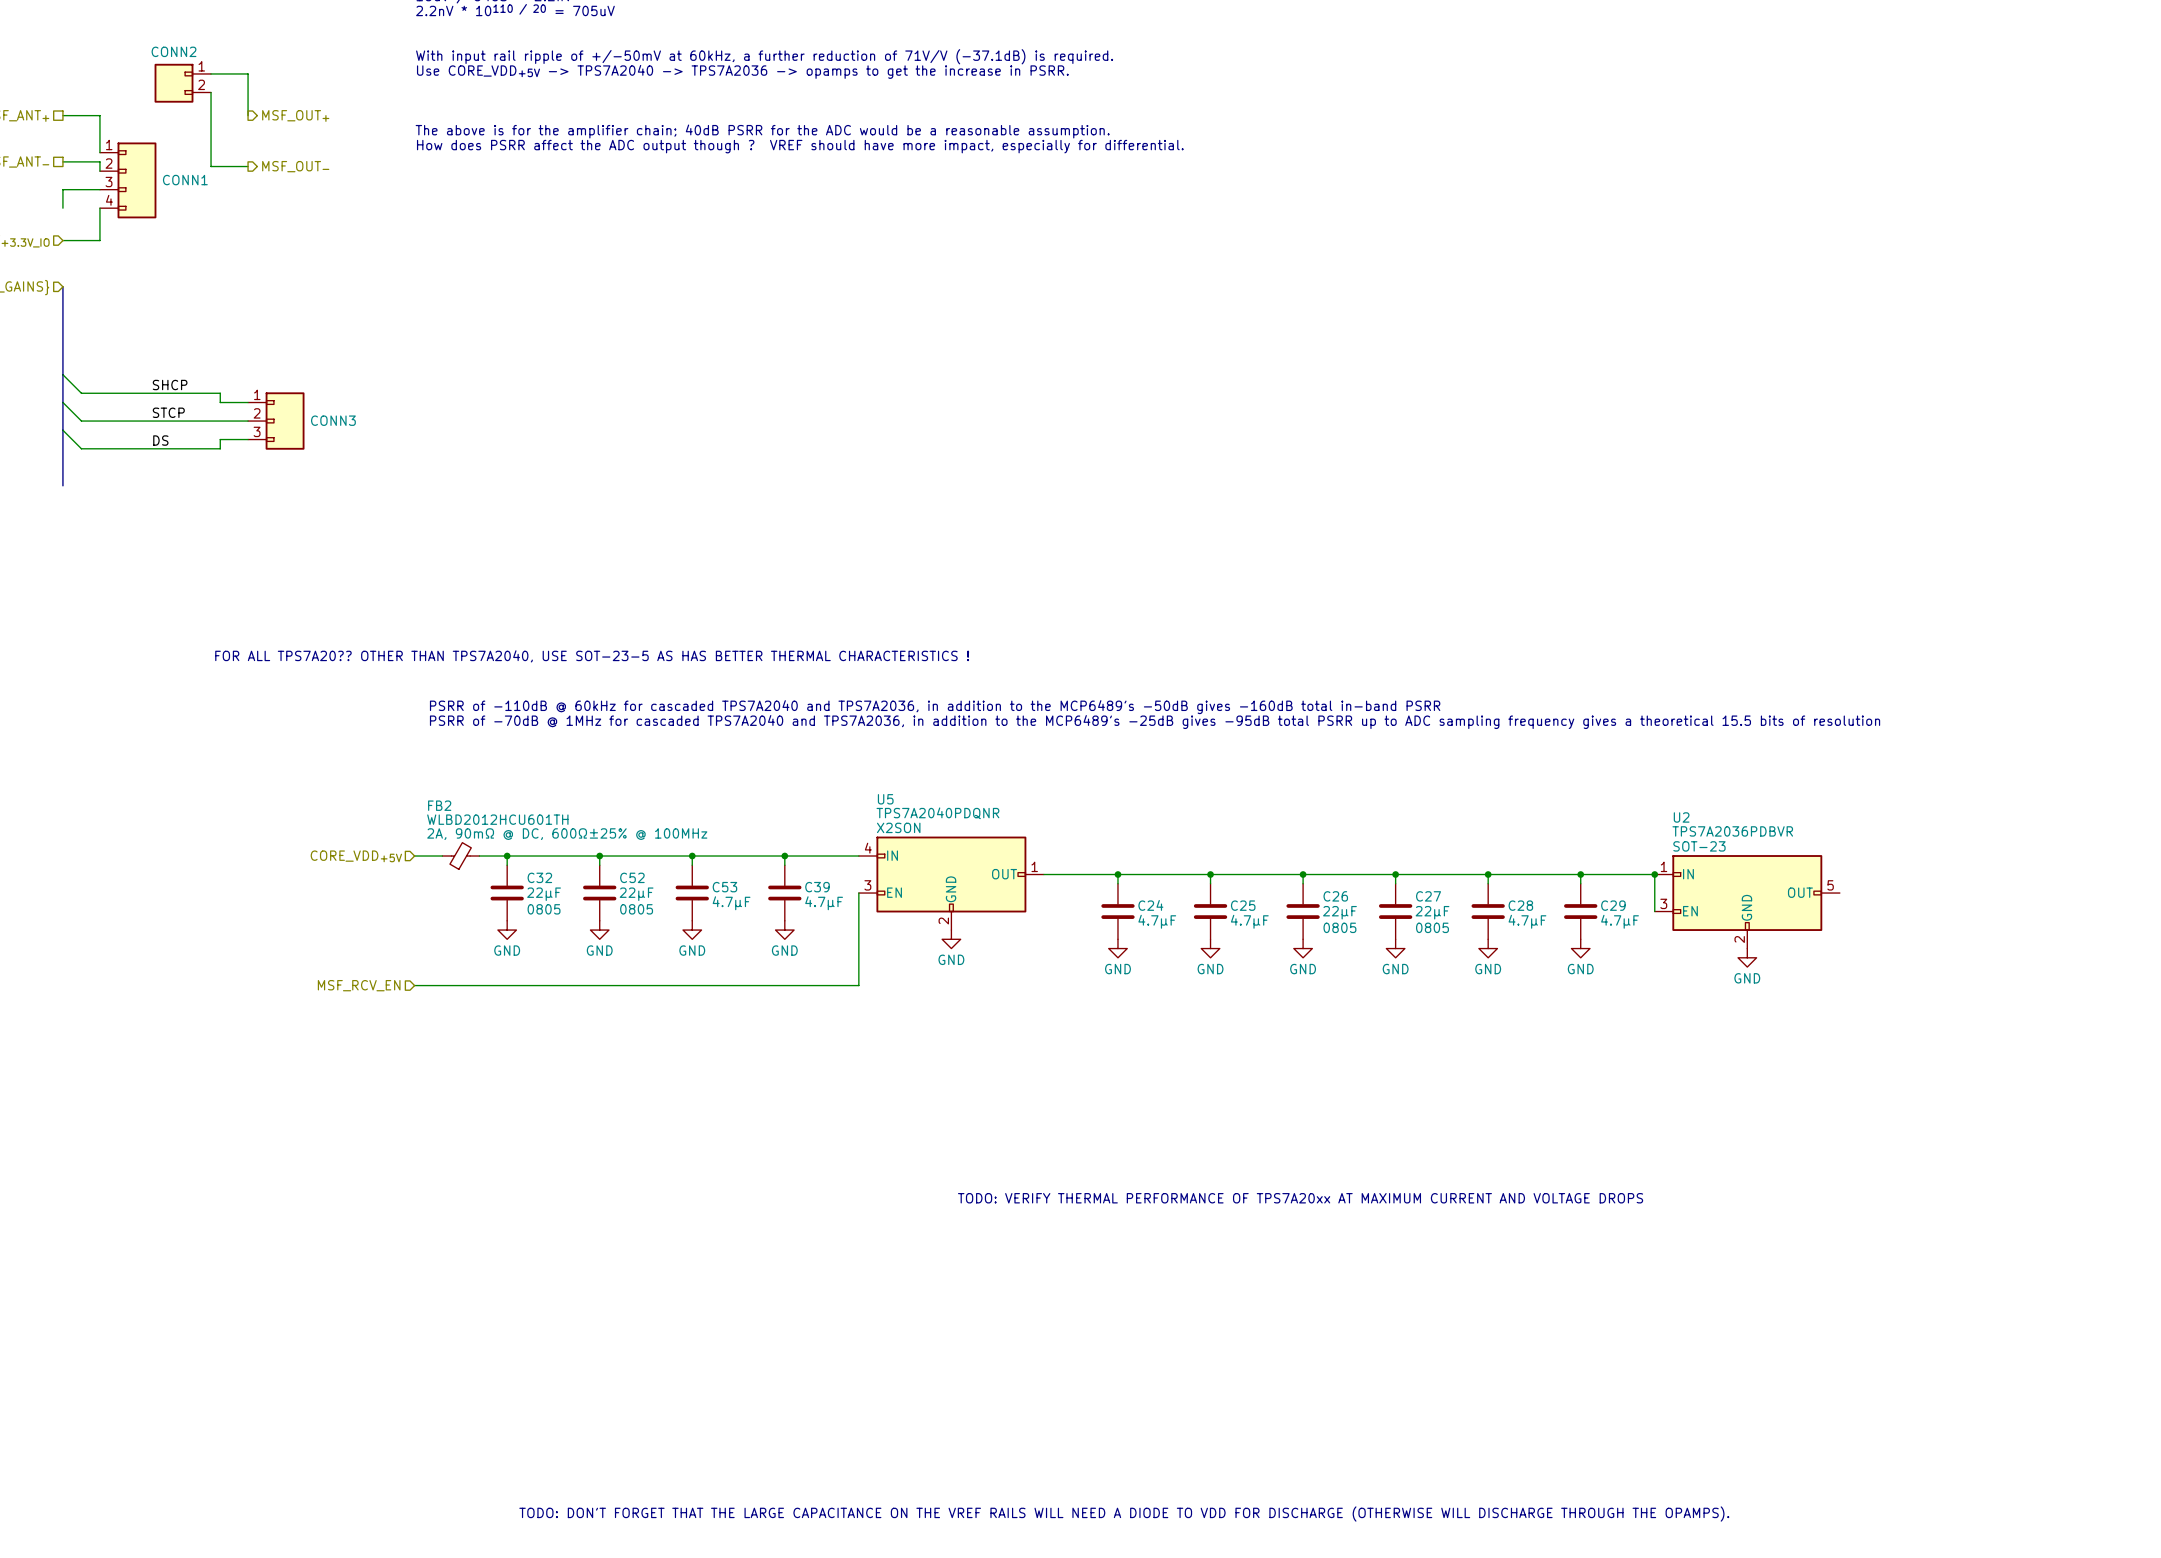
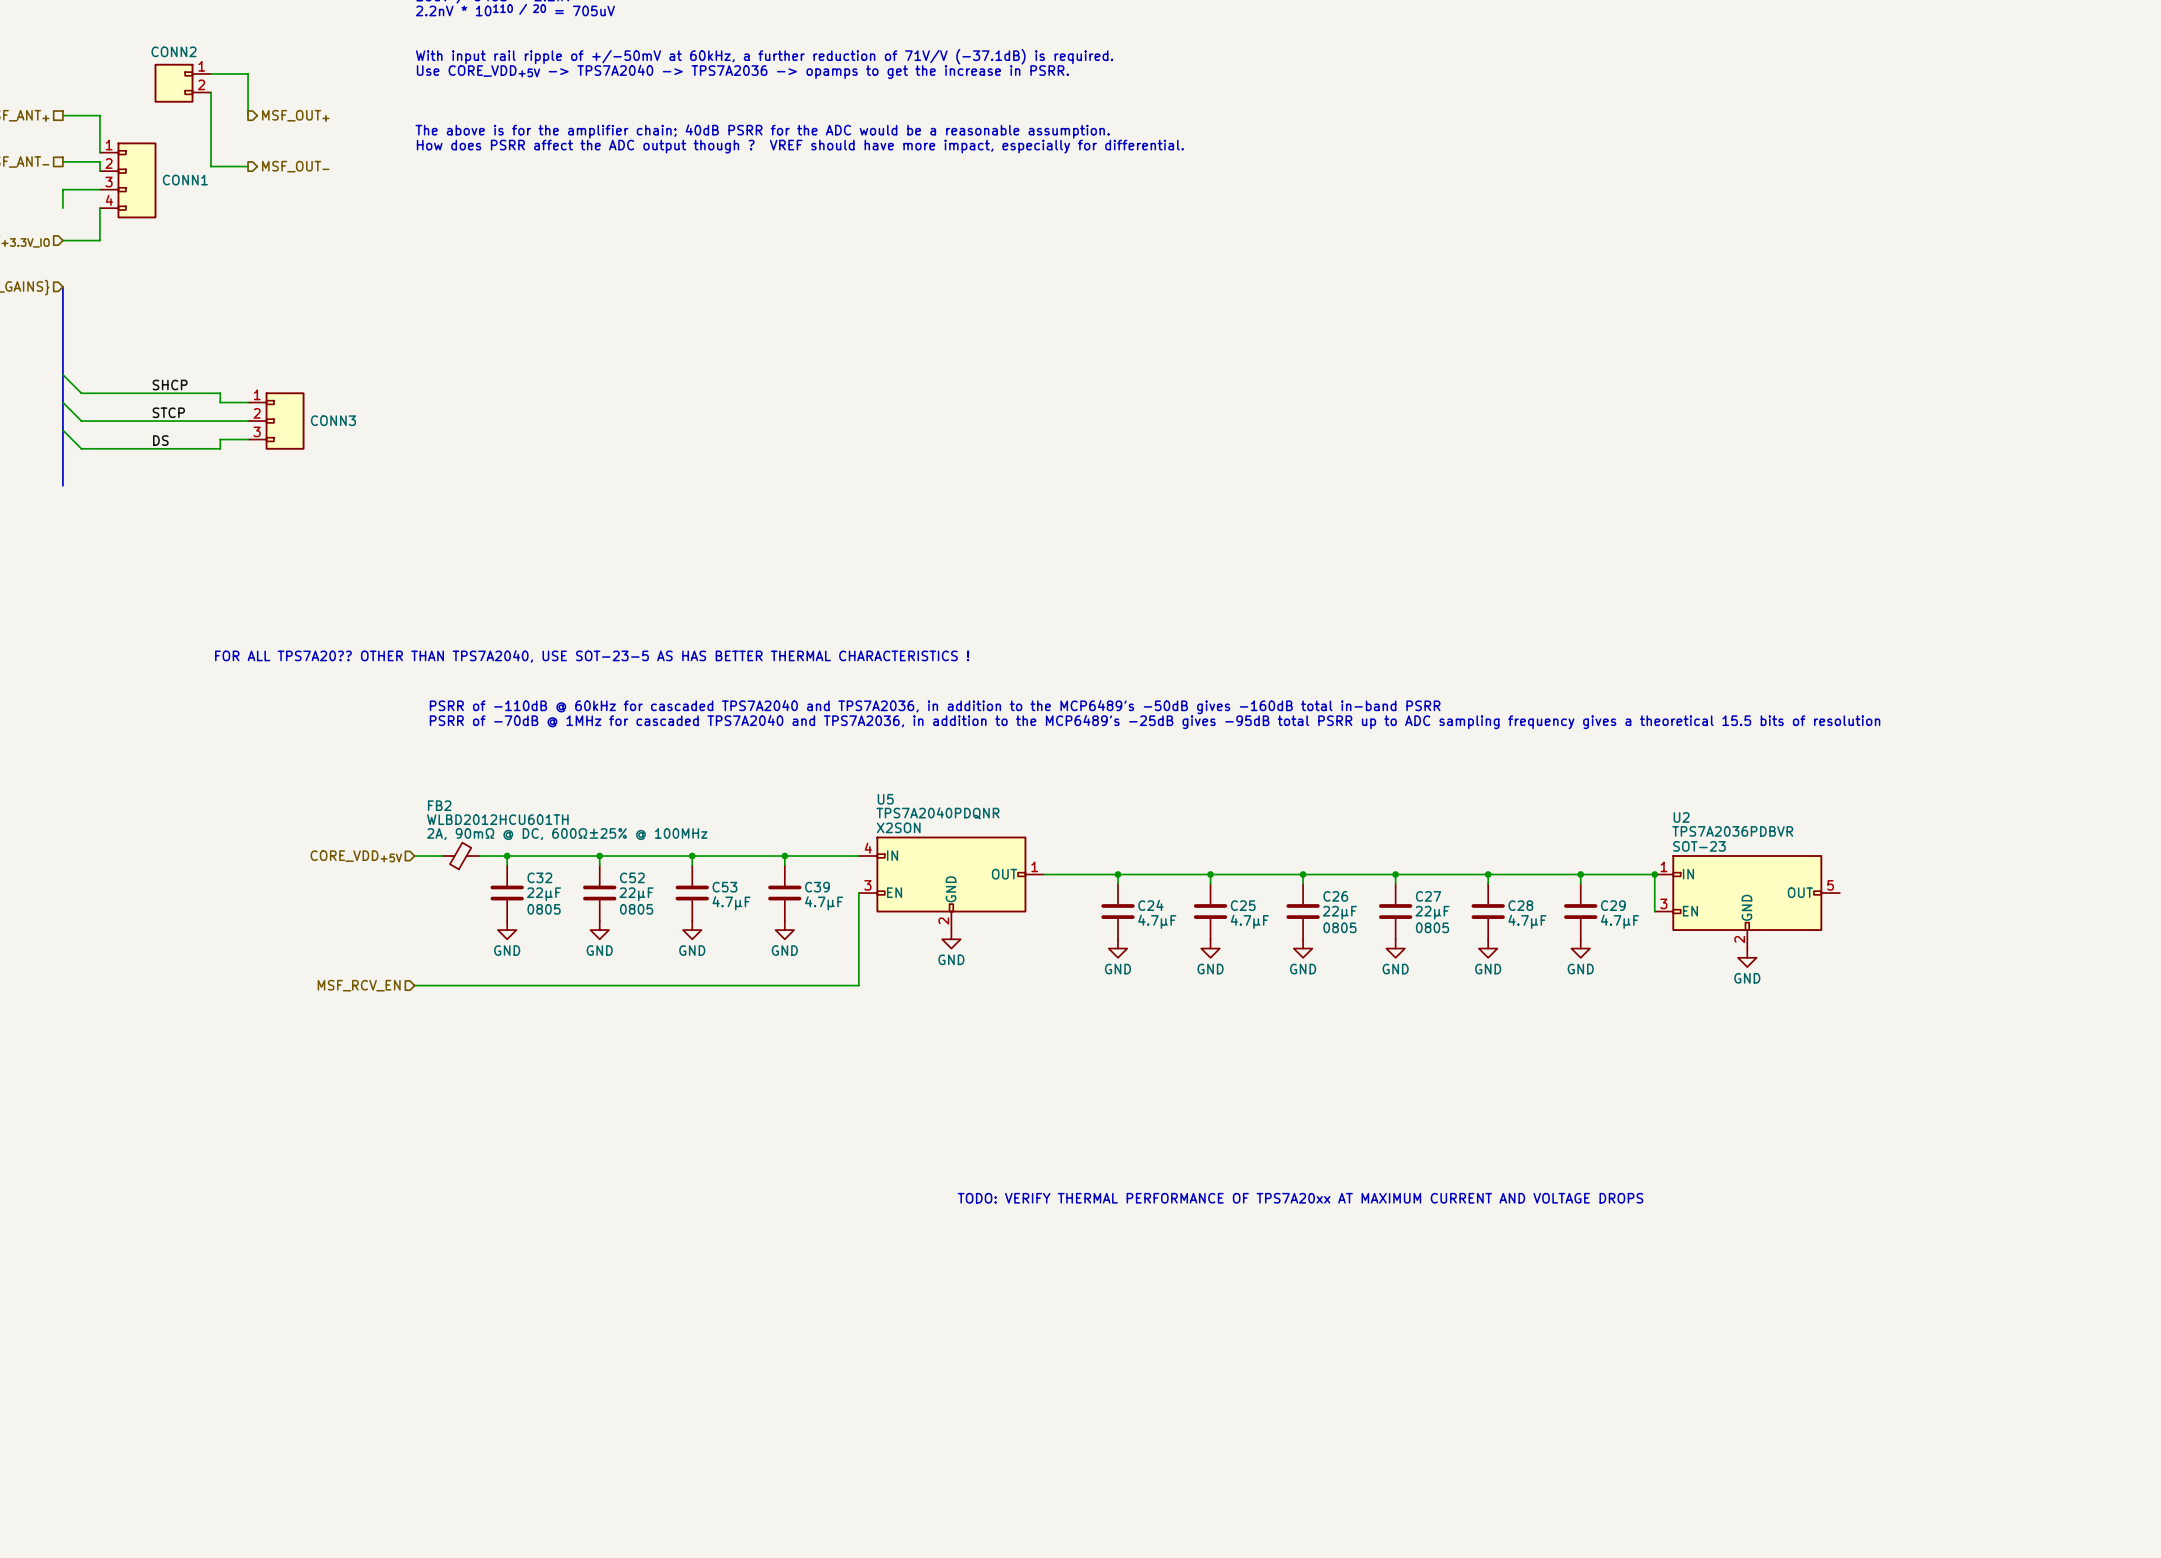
text: TODO: DON'T FORGET THAT THE LARGE CAPACITANCE ON THE VREF RAILS WILL NEED A DIODE TO VDD FOR DISCHARGE (OTHERWISE WILL DISCHARGE THROUGH THE OPAMPS). (1124, 1514) -> none

